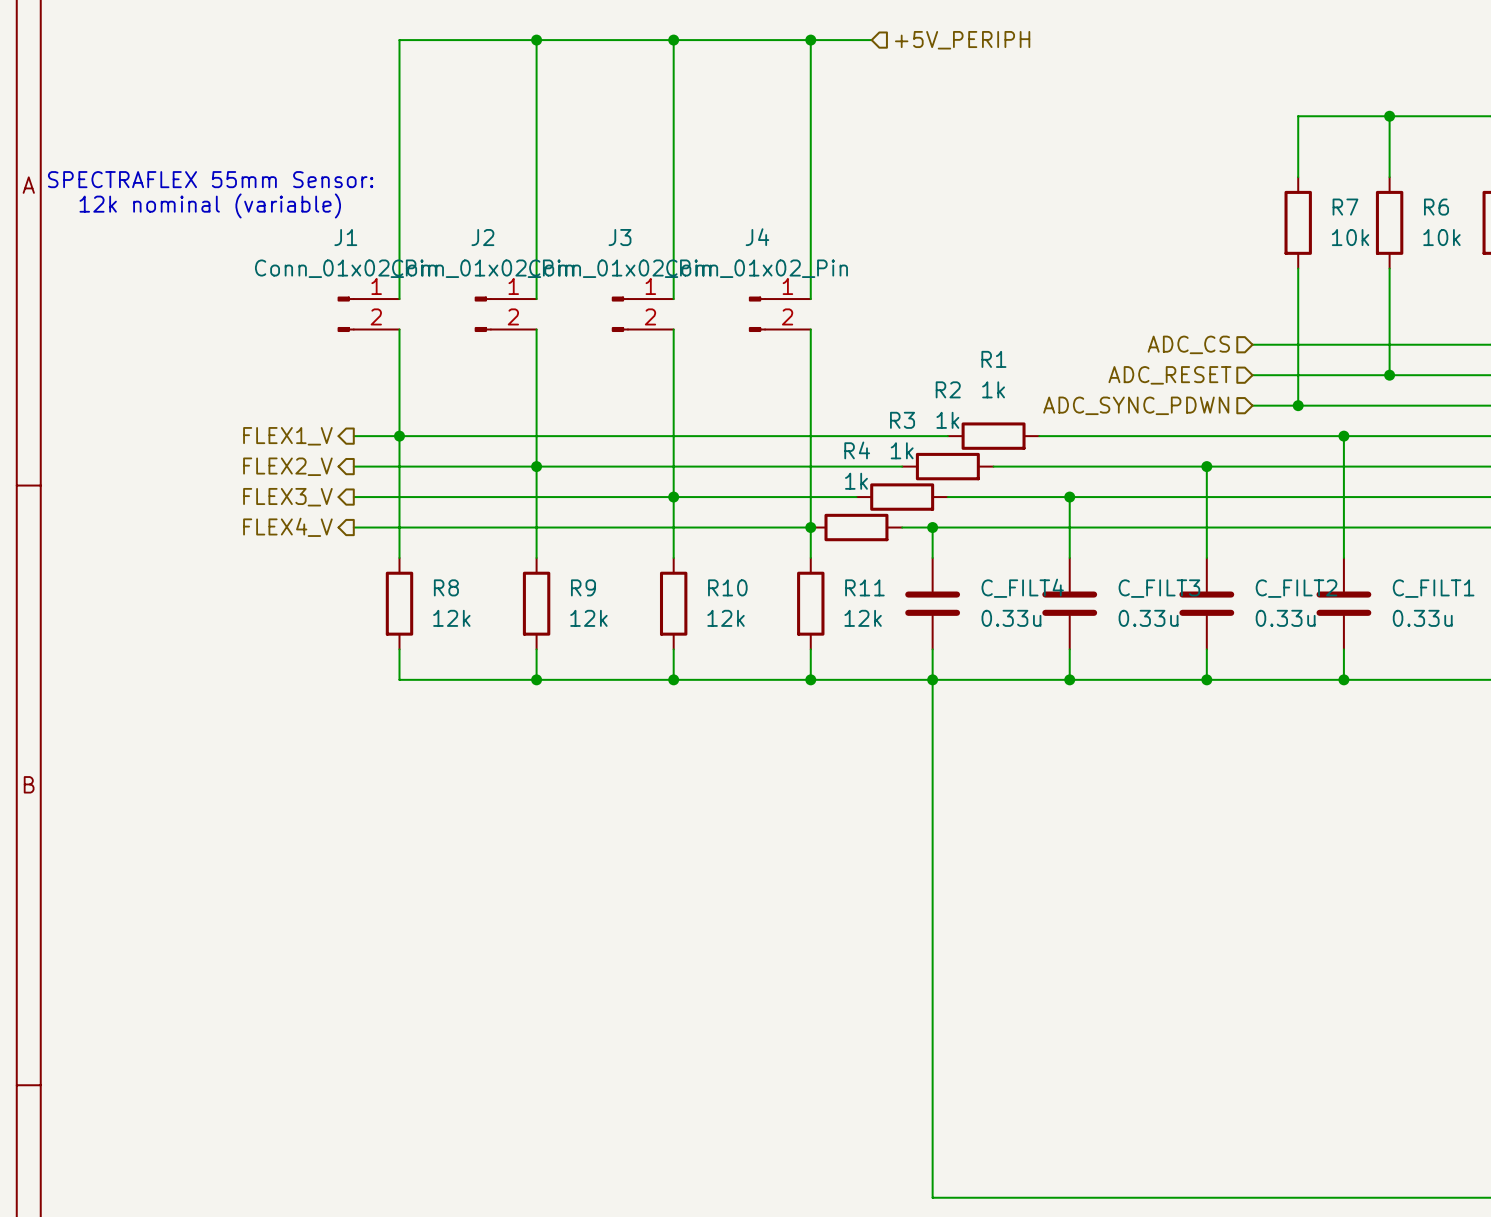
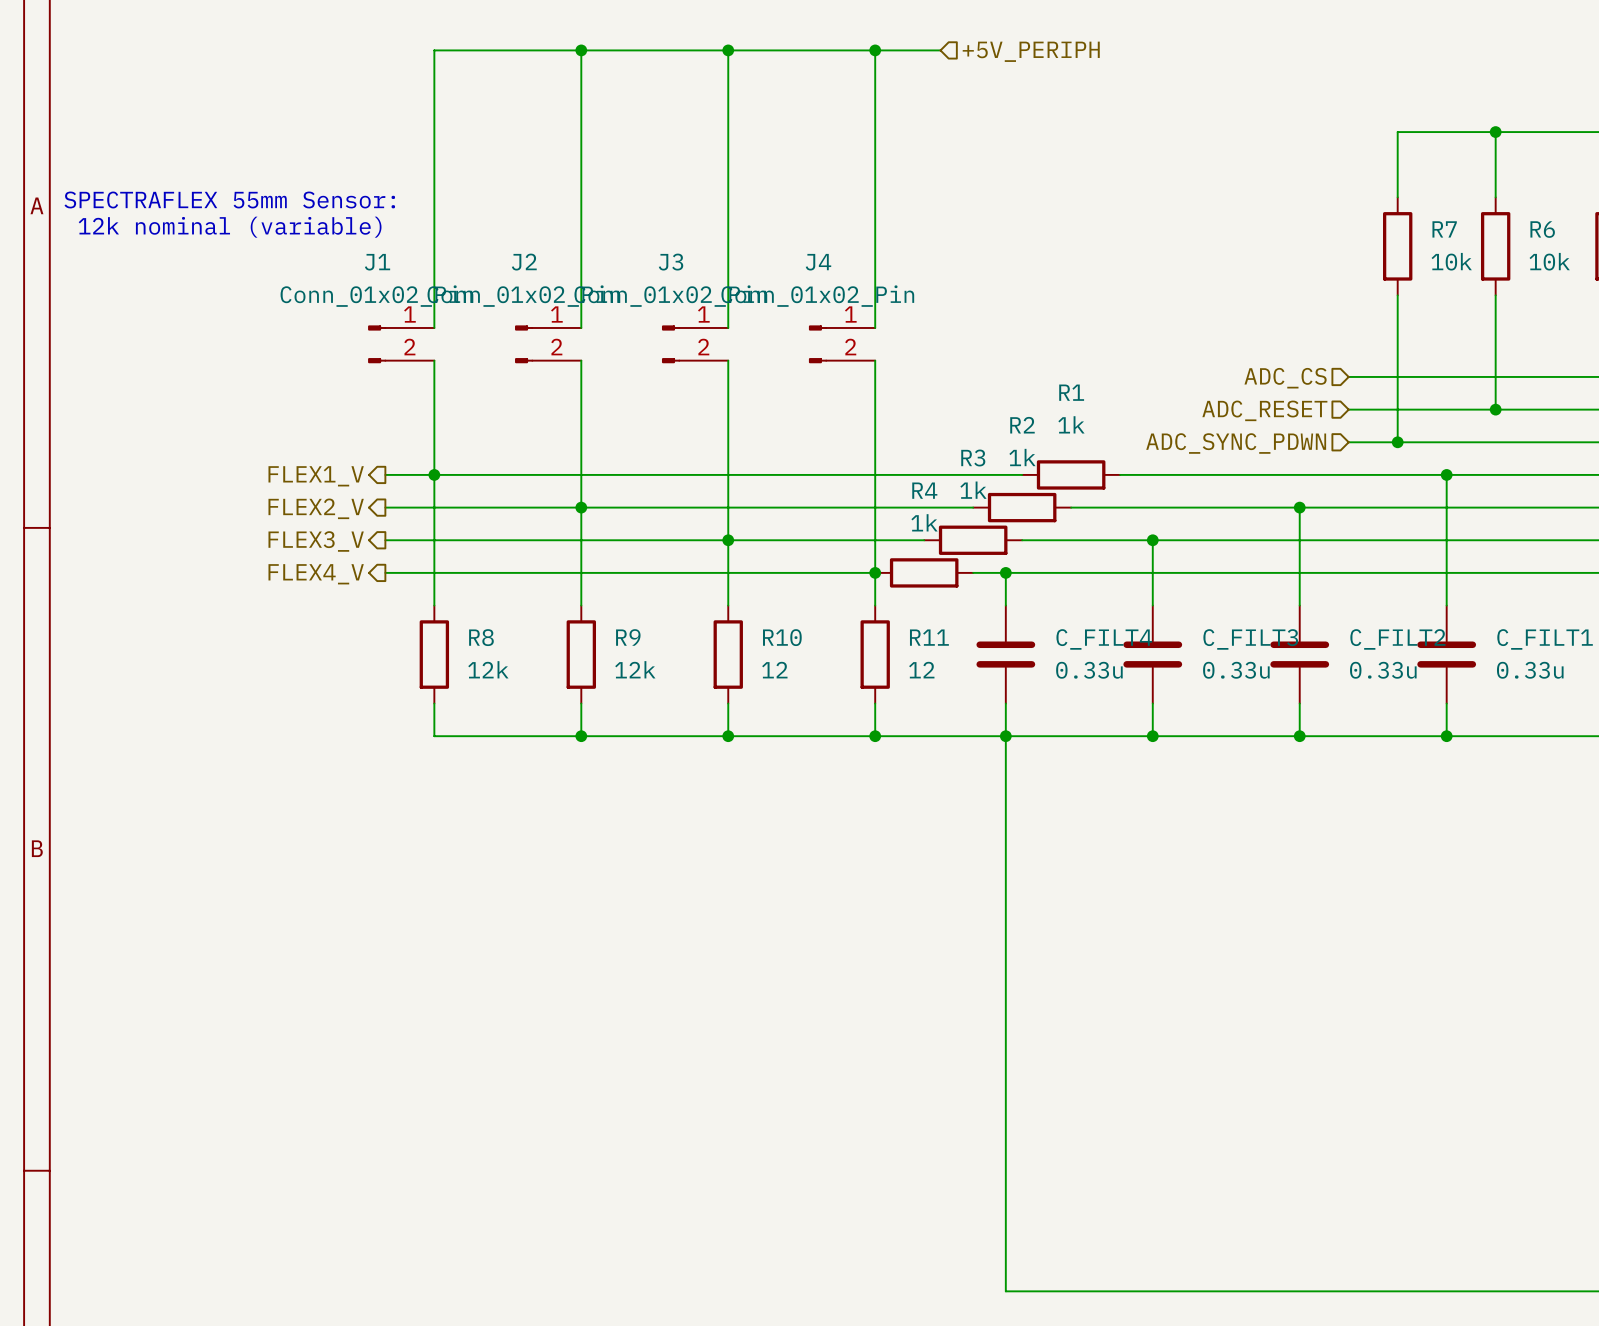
R10 value: 12k (726, 618) -> 12 (774, 670)
R11 value: 12k (863, 618) -> 12 (921, 670)

